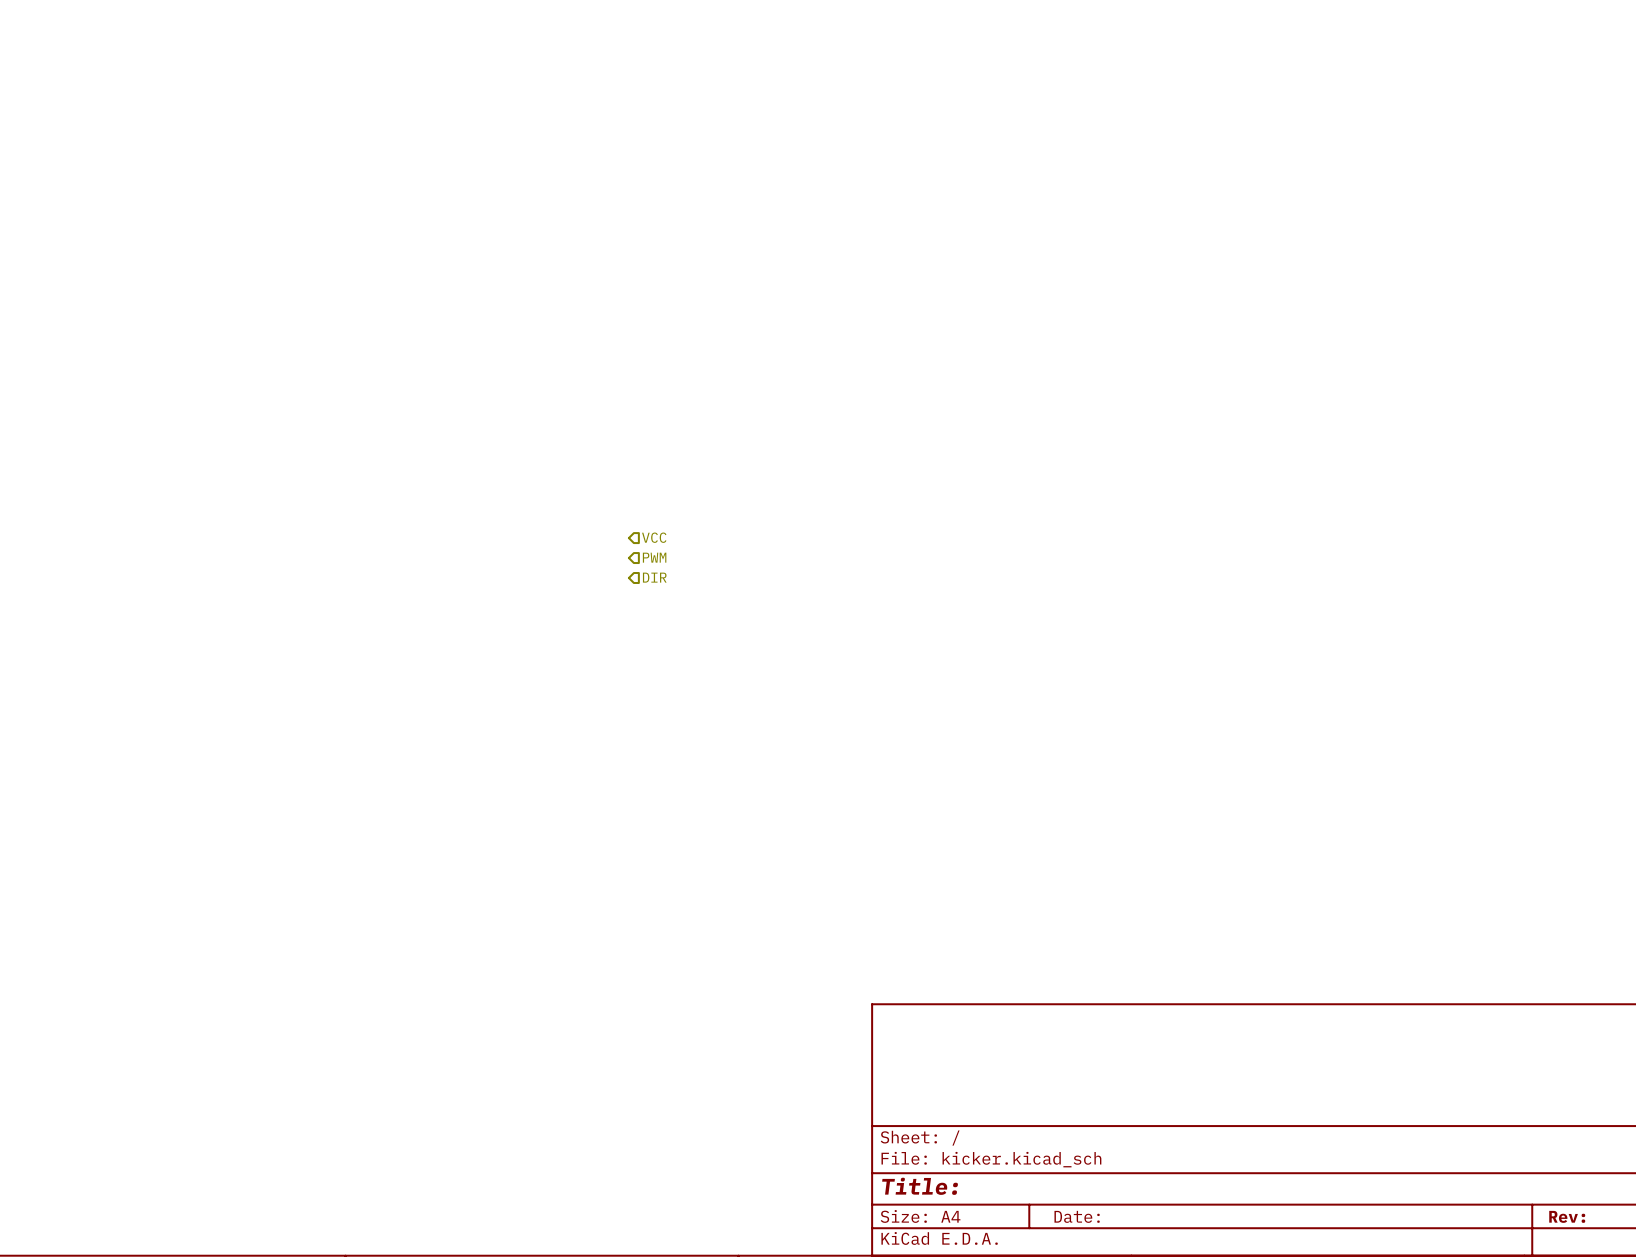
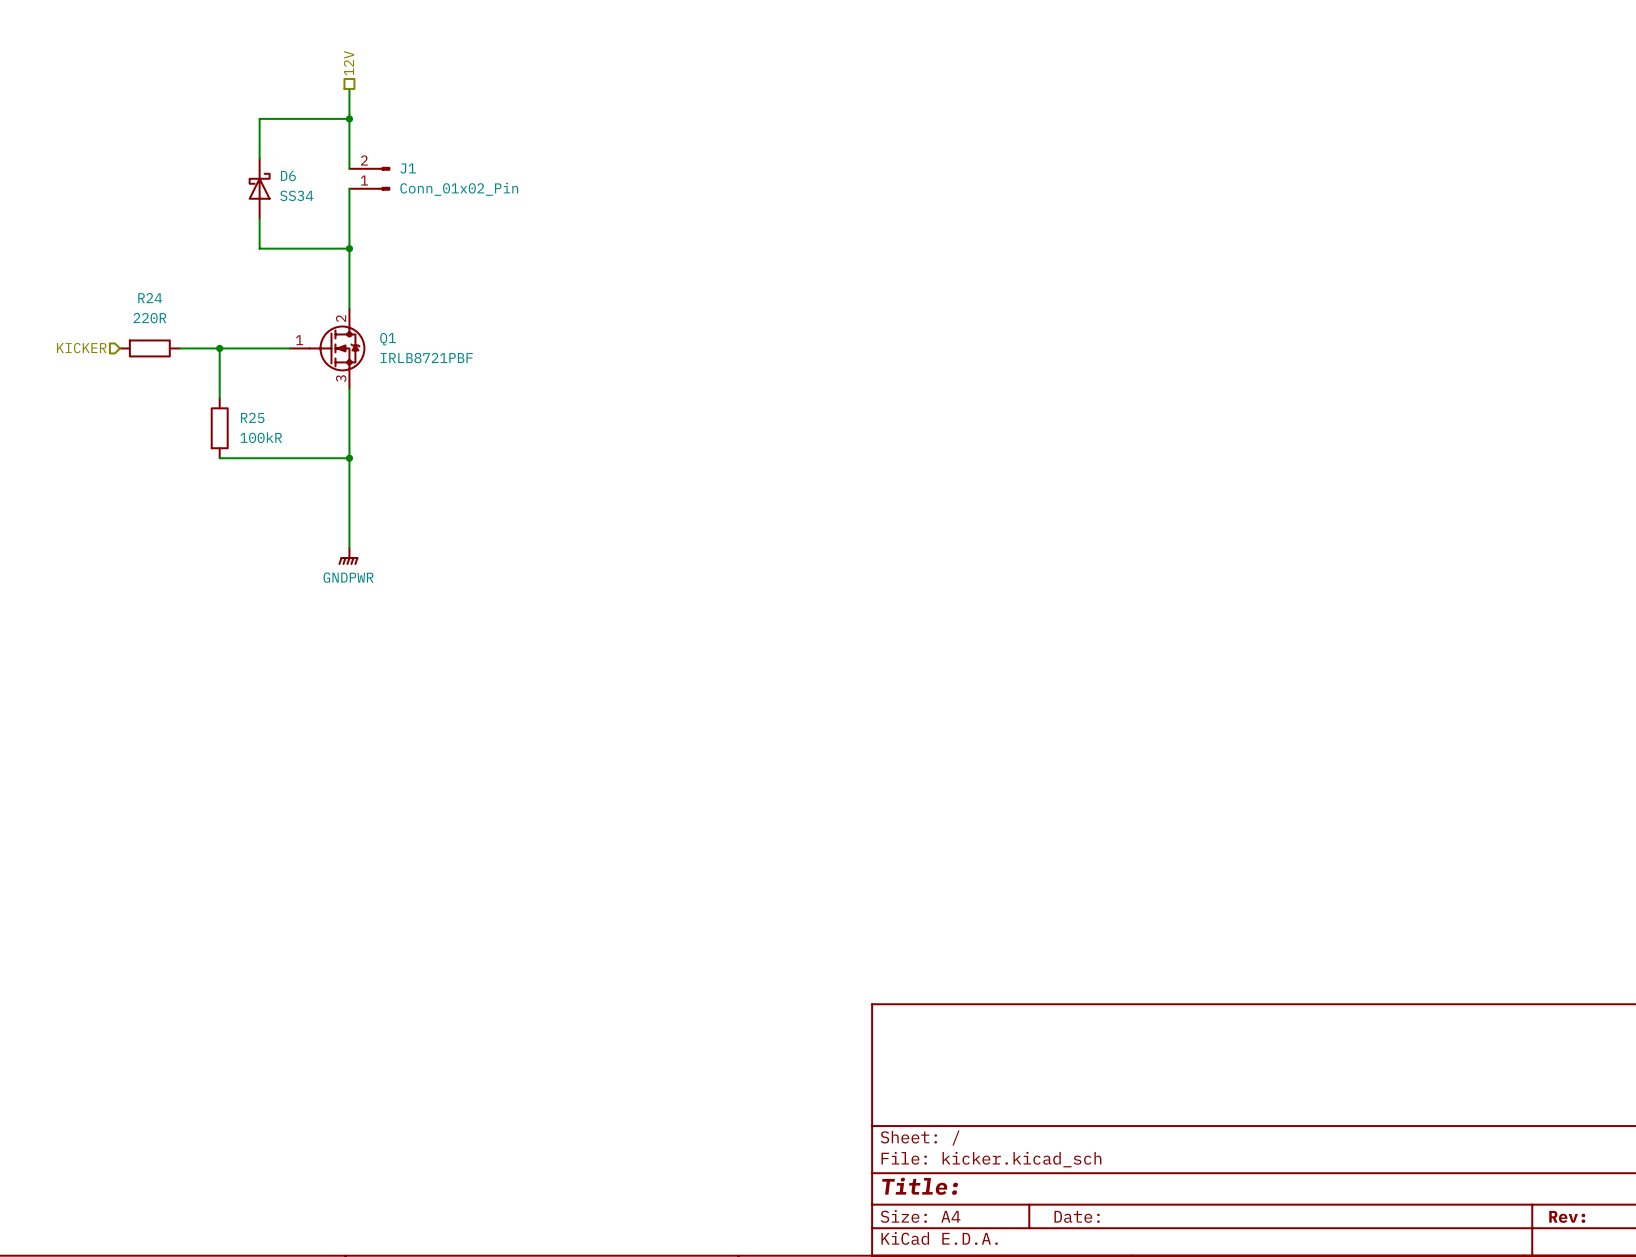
hierarchical label: none -> 12V (348, 63)
wire: none -> (349, 88) (349, 168)
wire: none -> (349, 118) (259, 118) (259, 158)
junction: none -> (349, 118)
J1: none -> Conn_01x02_Pin (369, 178)
D6: none -> SS34 (259, 188)
wire: none -> (349, 188) (349, 308)
wire: none -> (259, 218) (259, 248) (349, 248)
junction: none -> (349, 248)
hierarchical label: none -> KICKER (81, 348)
R24: none -> 220R (149, 348)
wire: none -> (179, 348) (289, 348)
wire: none -> (219, 348) (219, 398)
junction: none -> (219, 348)
Q1: none -> IRLB8721PBF (327, 348)
wire: none -> (349, 388) (349, 548)
R25: none -> 100kR (219, 428)
wire: none -> (219, 458) (349, 458)
junction: none -> (349, 458)
hierarchical label: VCC (654, 537) -> none
power symbol: none -> GNDPWR (348, 556)
hierarchical label: PWM (654, 557) -> none
hierarchical label: DIR (654, 577) -> none

